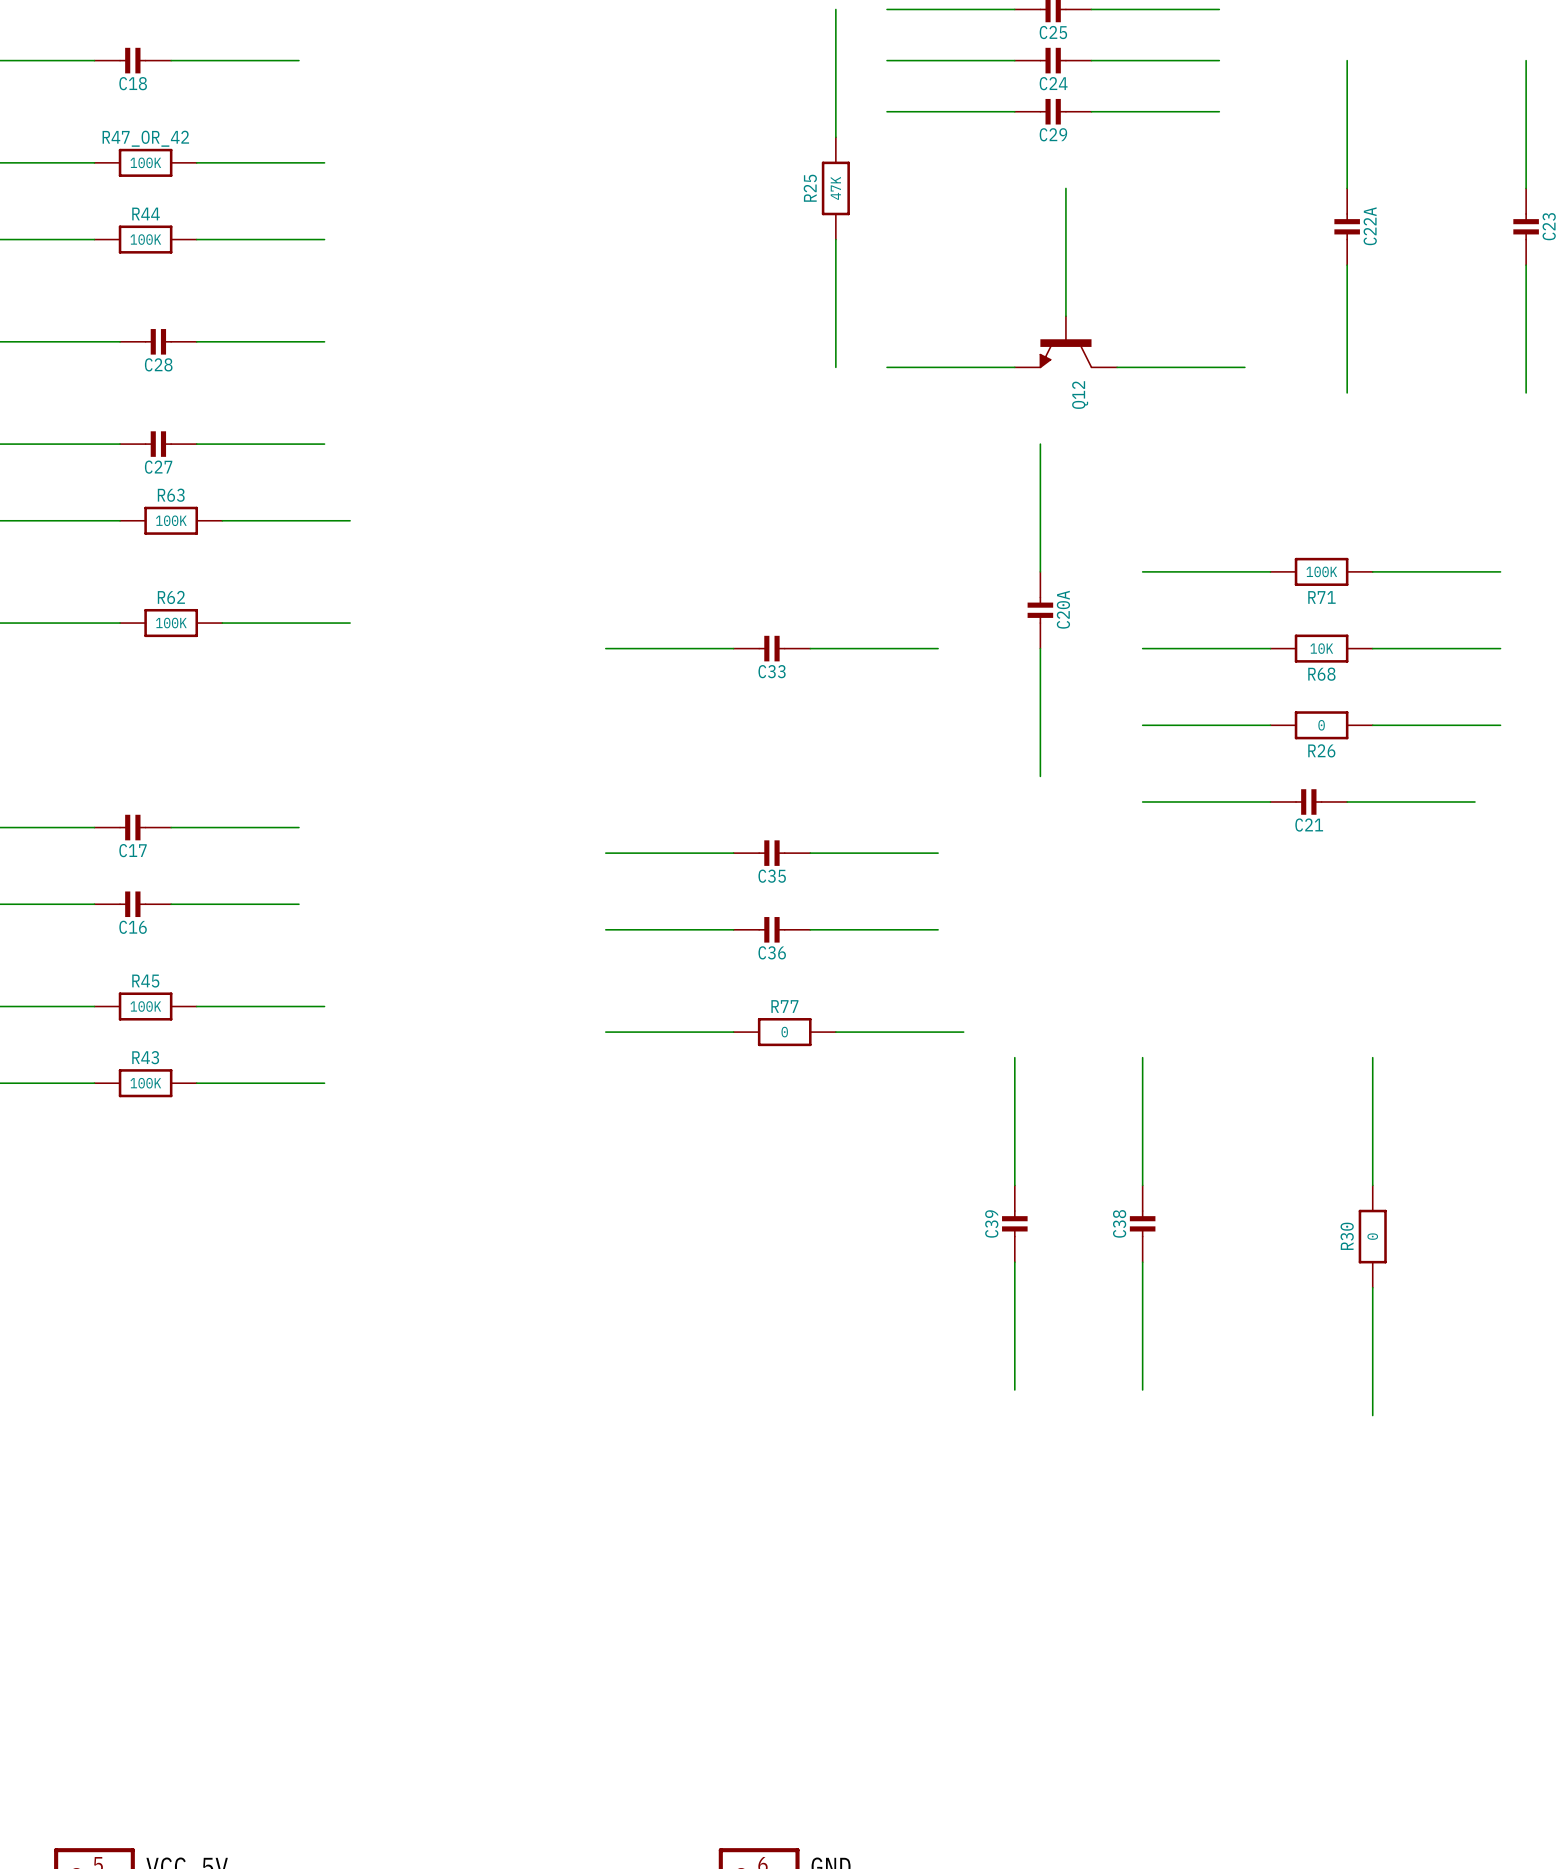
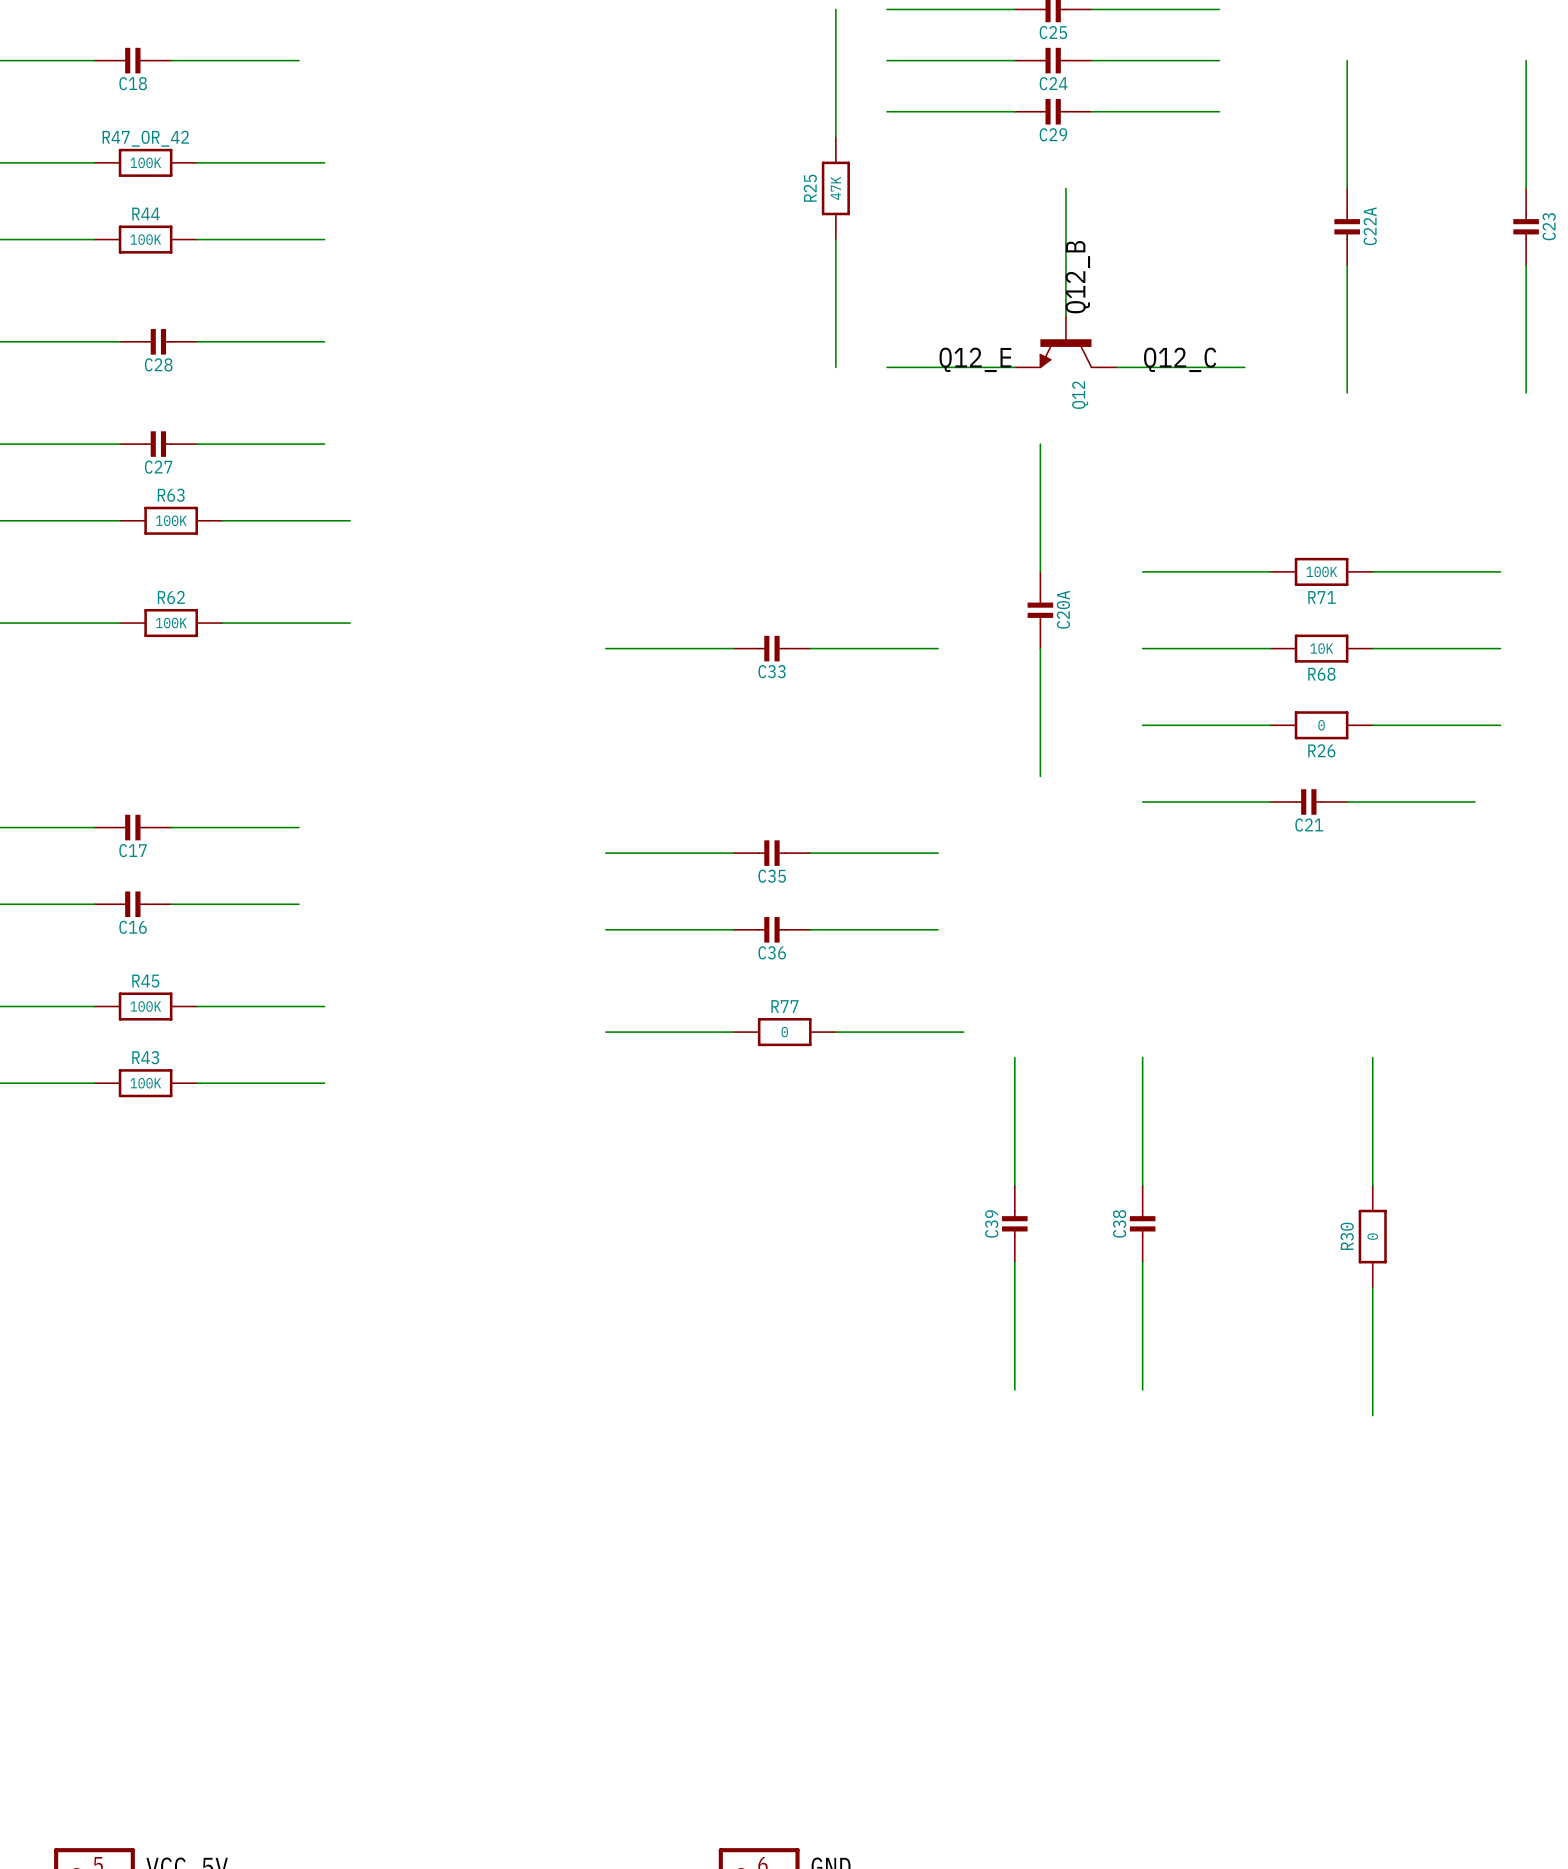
label: none -> Q12_B (1077, 277)
label: none -> Q12_E (975, 359)
label: none -> Q12_C (1180, 359)

